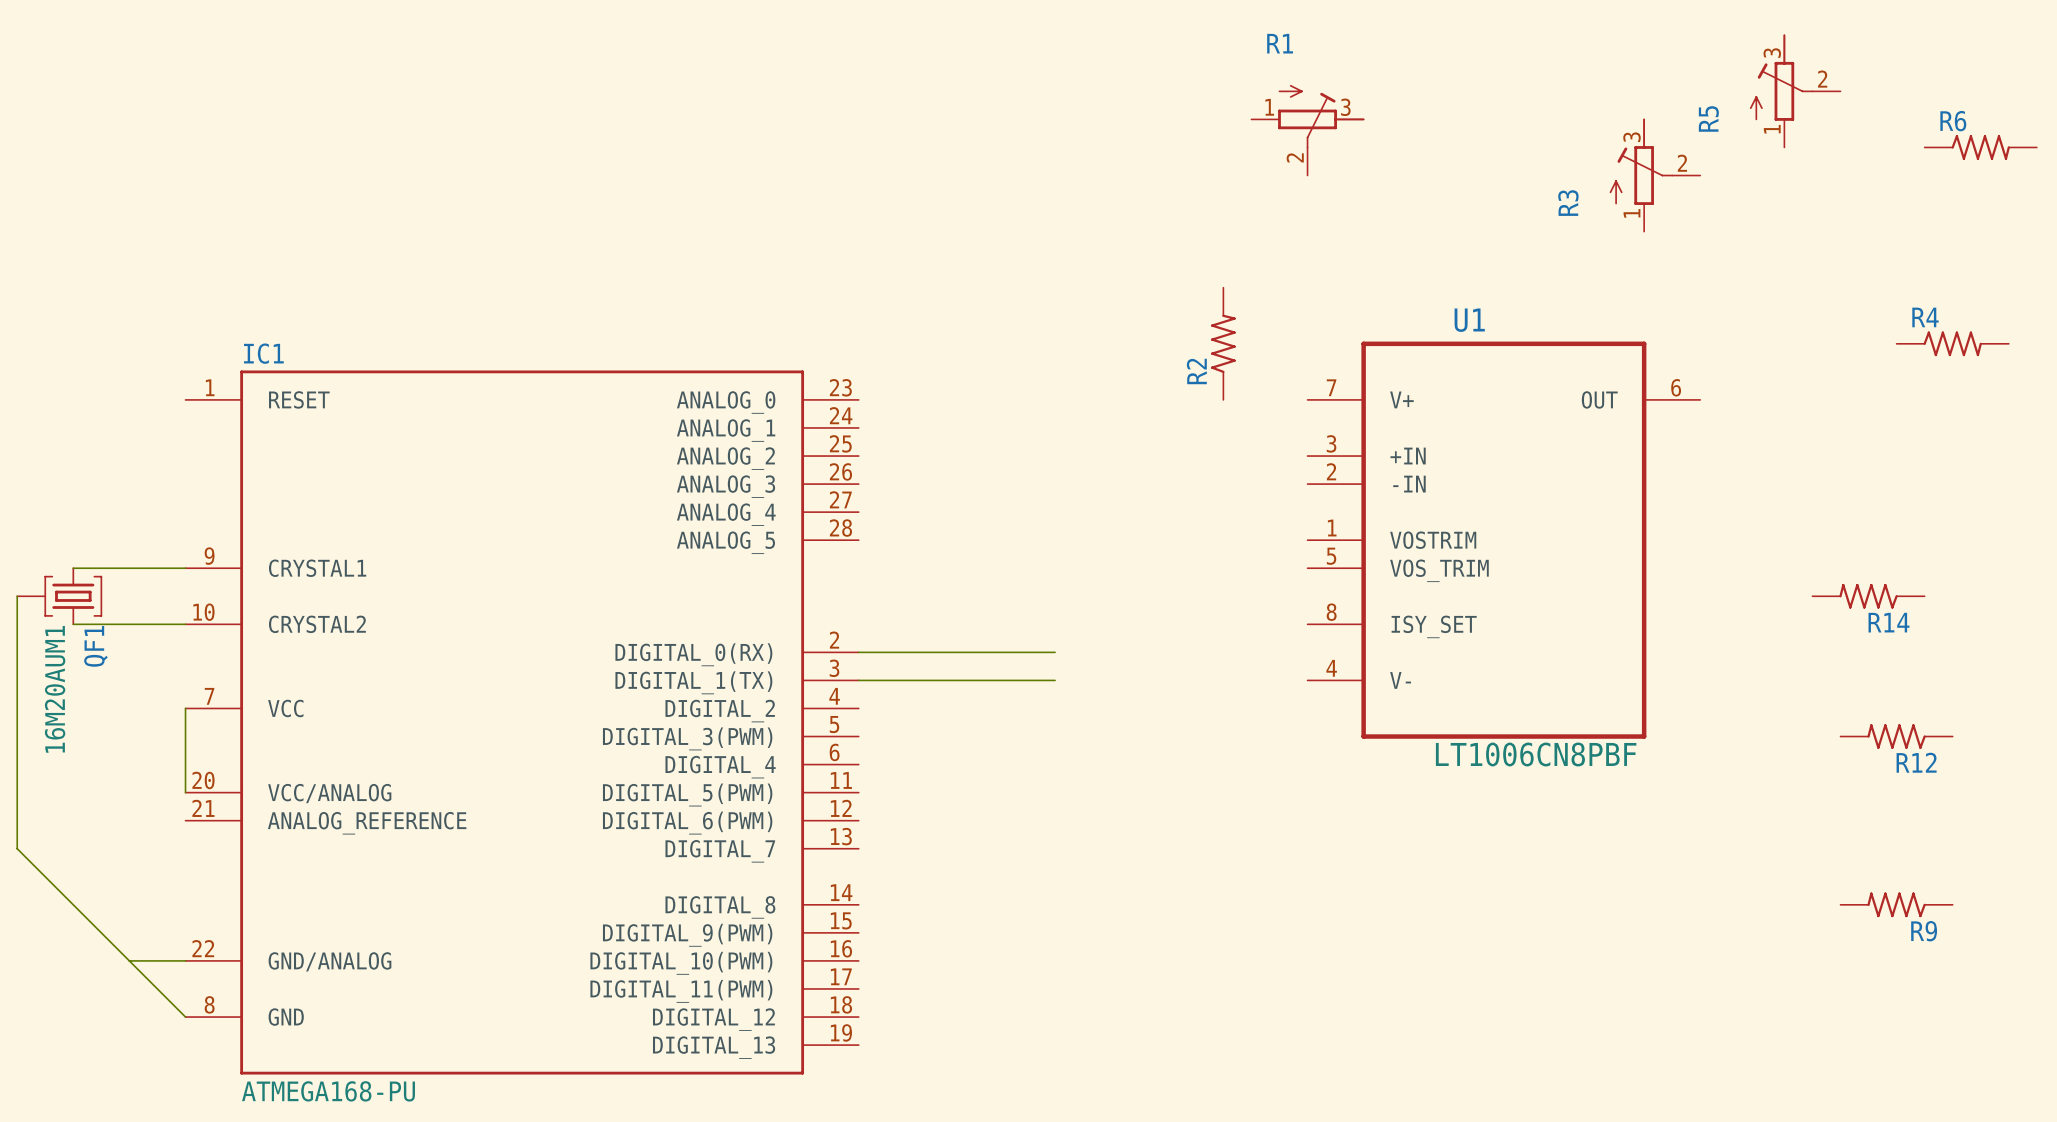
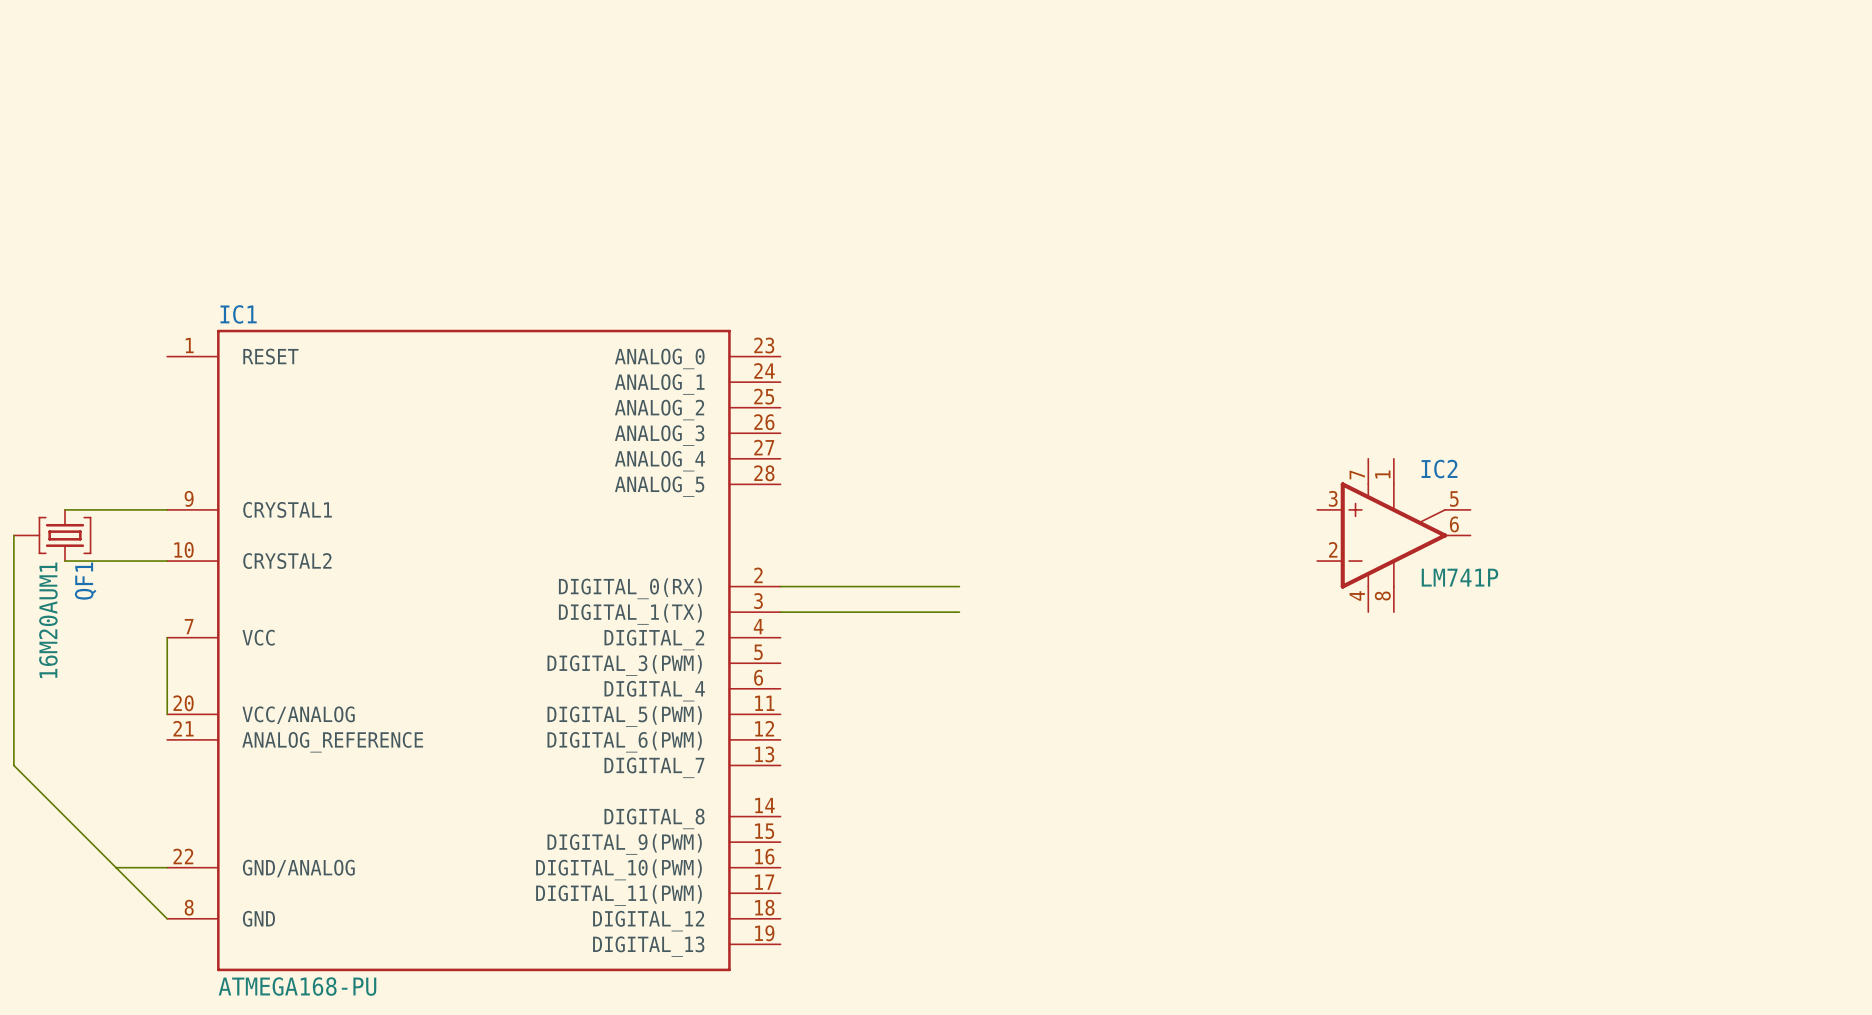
R5: (1795, 90) -> none
R1: (1307, 130) -> none
R6: (1980, 147) -> none
R3: (1654, 175) -> none
R2: (1223, 343) -> none
R4: (1952, 343) -> none
U1: LT1006CN8PBF (1503, 540) -> none
IC2: none -> LM741P (1393, 535)
R14: (1868, 596) -> none
R12: (1896, 736) -> none
R9: (1896, 904) -> none

